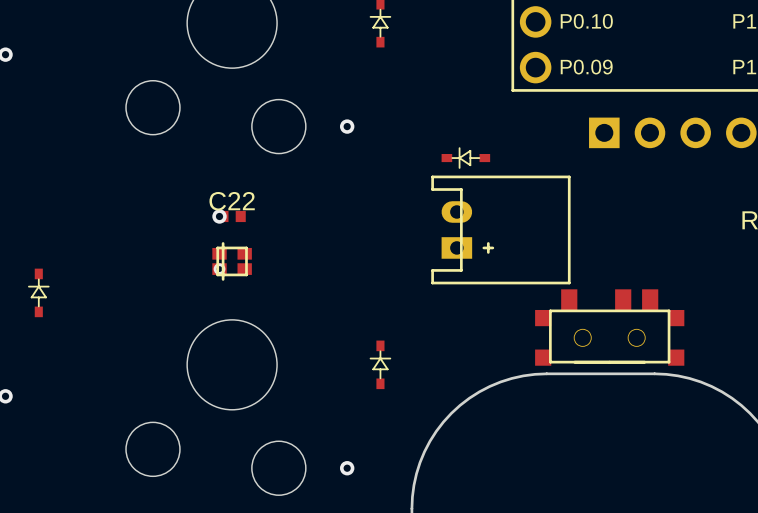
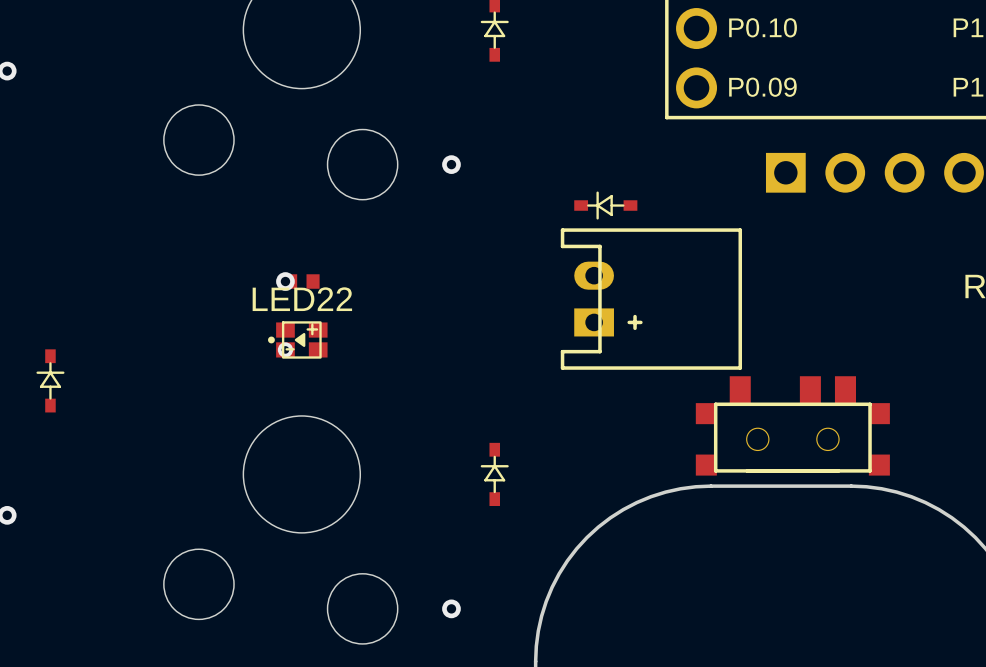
C22 name: C22 (232, 201) -> none
LED22: none -> (297, 339)
part: (232, 261) -> none

